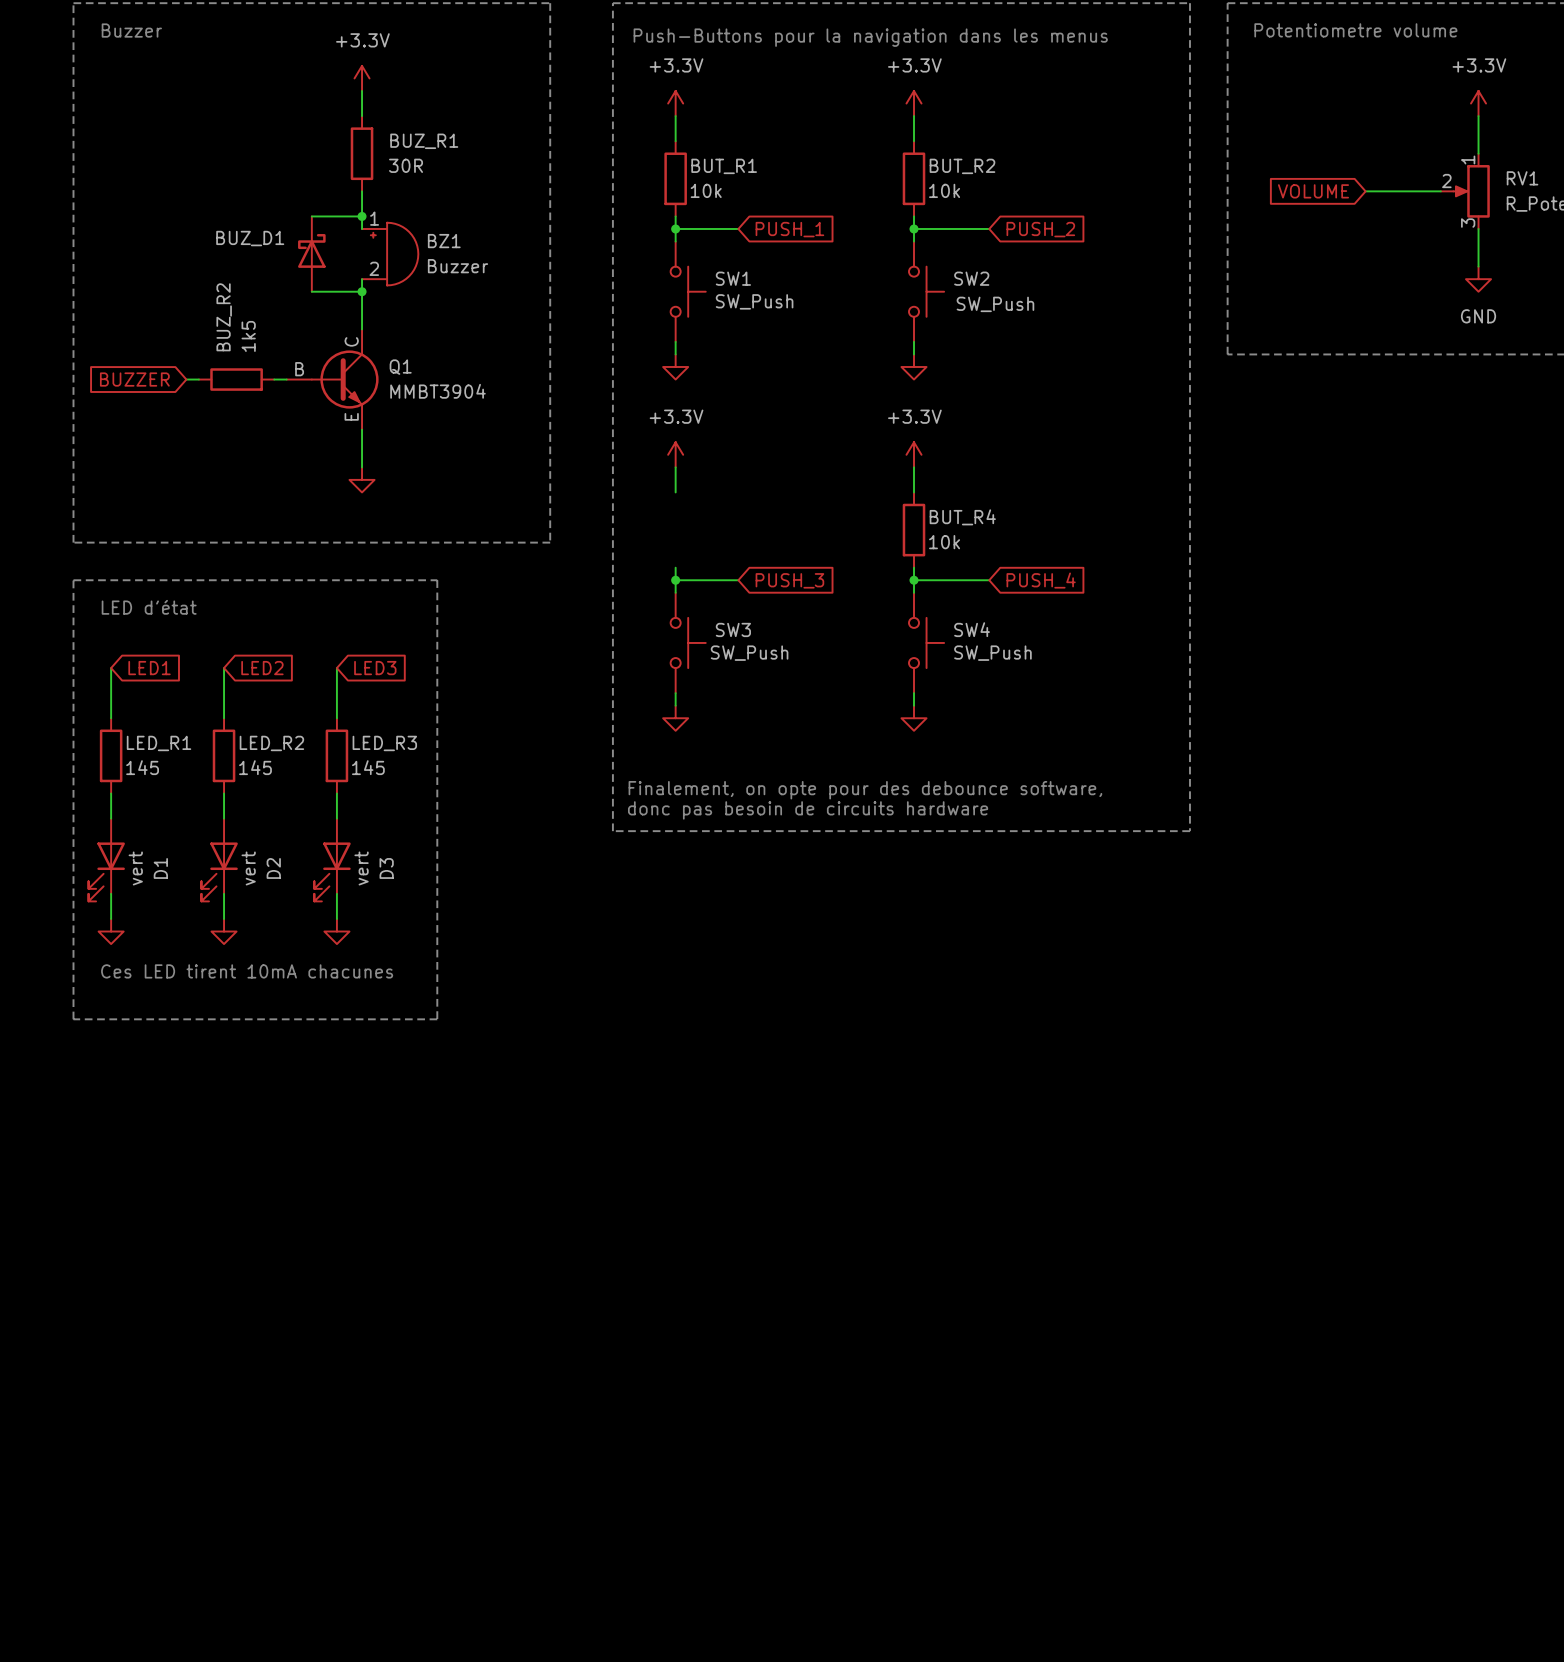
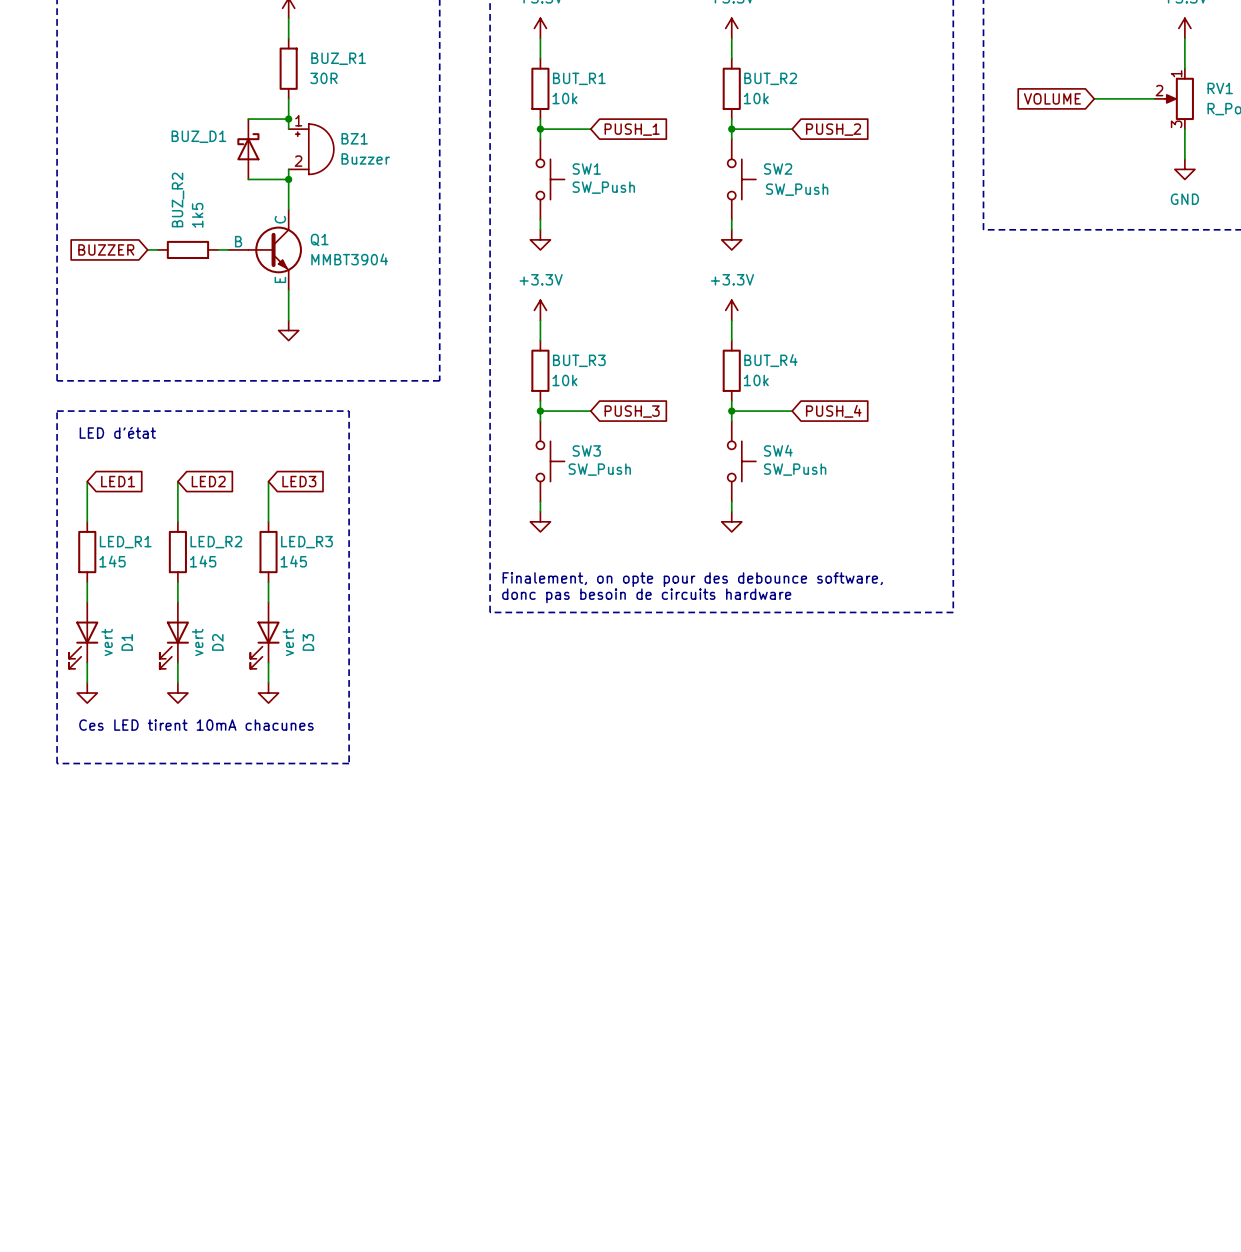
BUT_R3: none -> 10k (540, 370)

